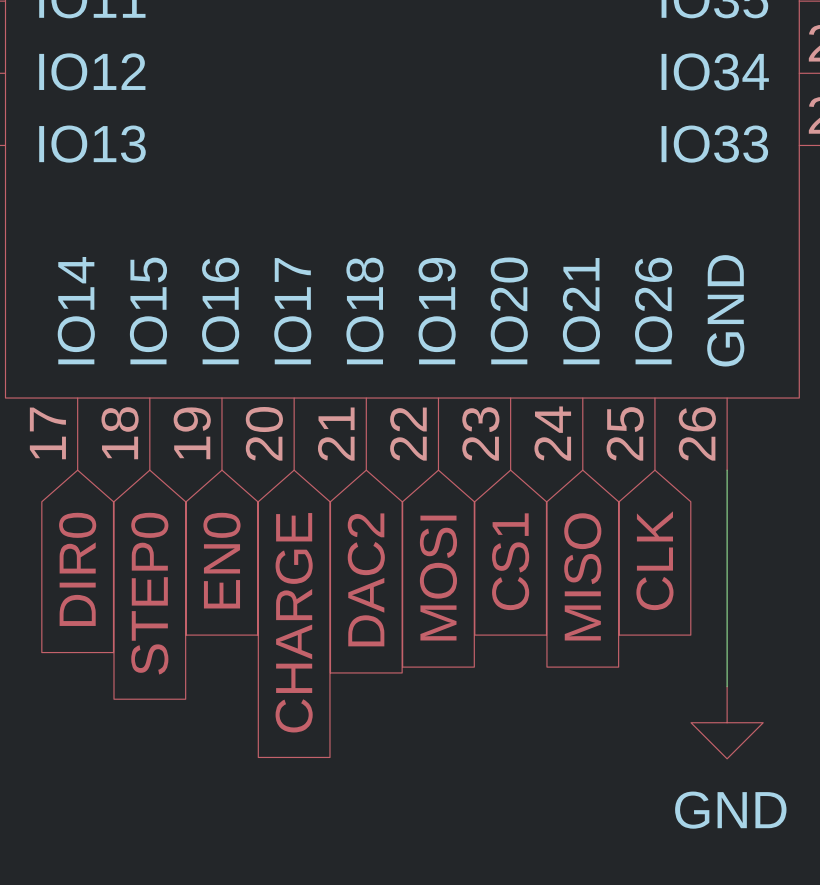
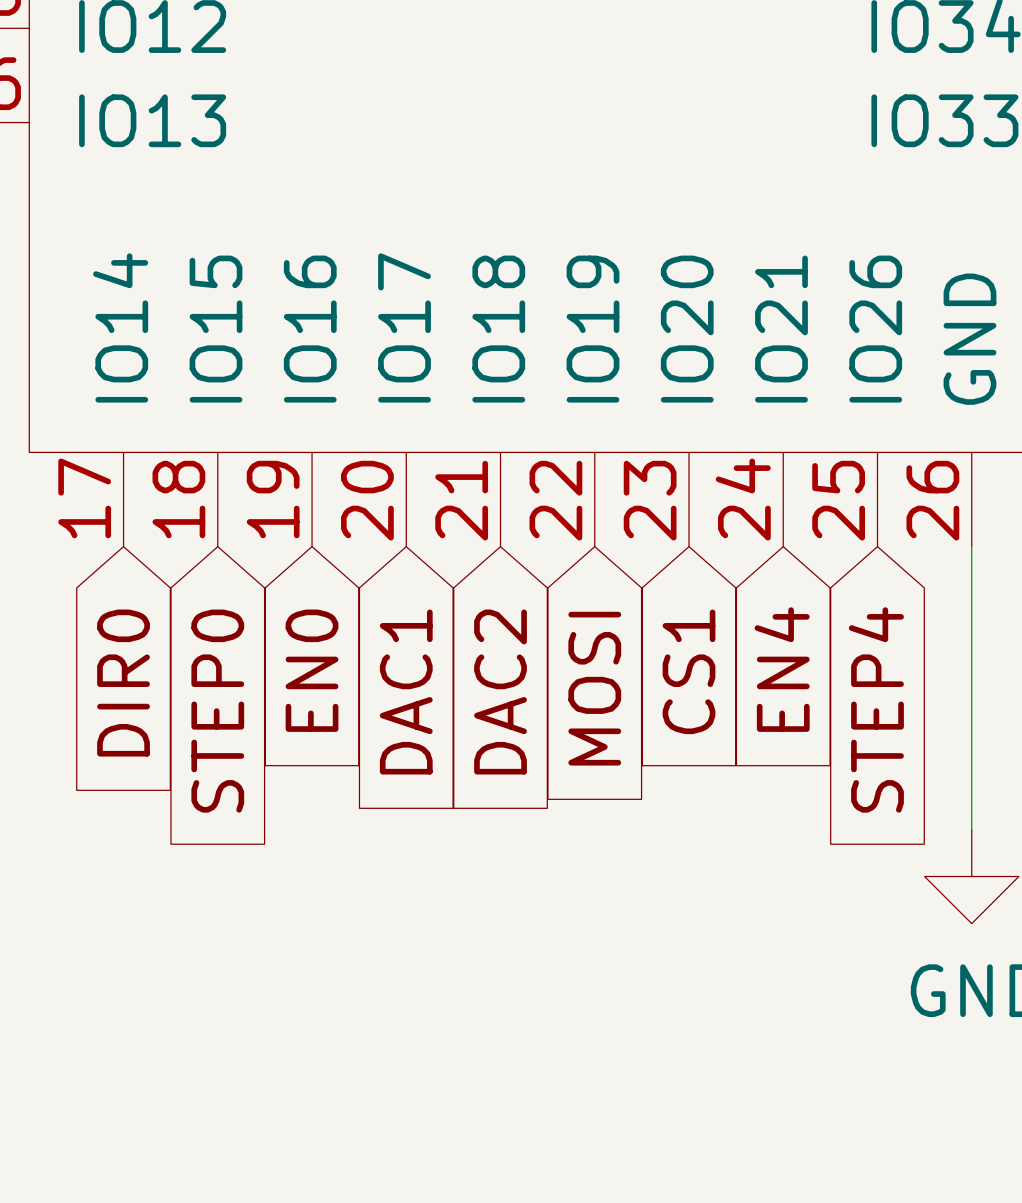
global label: CLK (654, 560) -> STEP4 (876, 709)
global label: MISO (582, 576) -> EN4 (782, 669)
global label: CHARGE (294, 622) -> DAC1 (406, 692)

